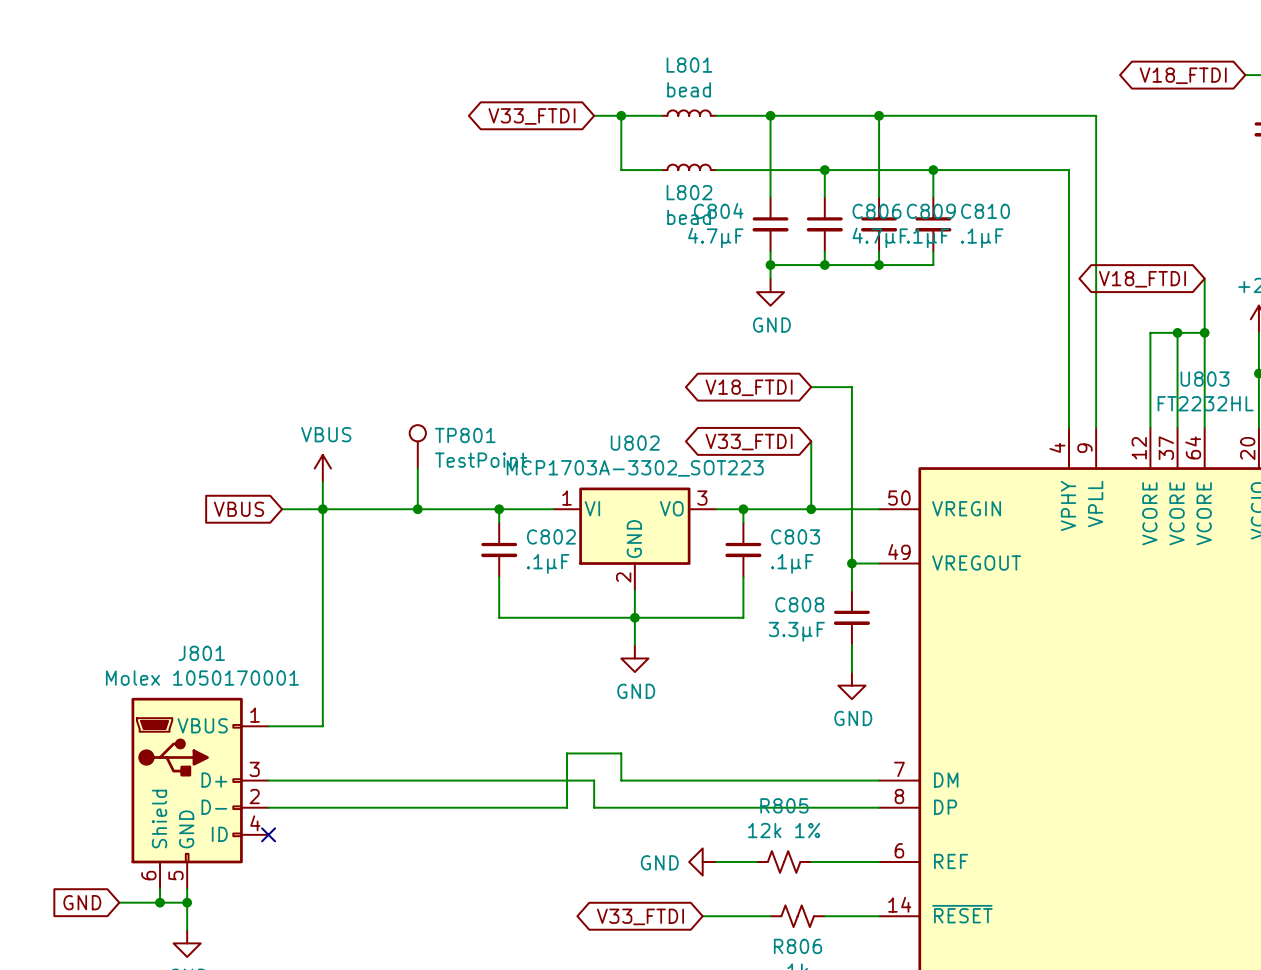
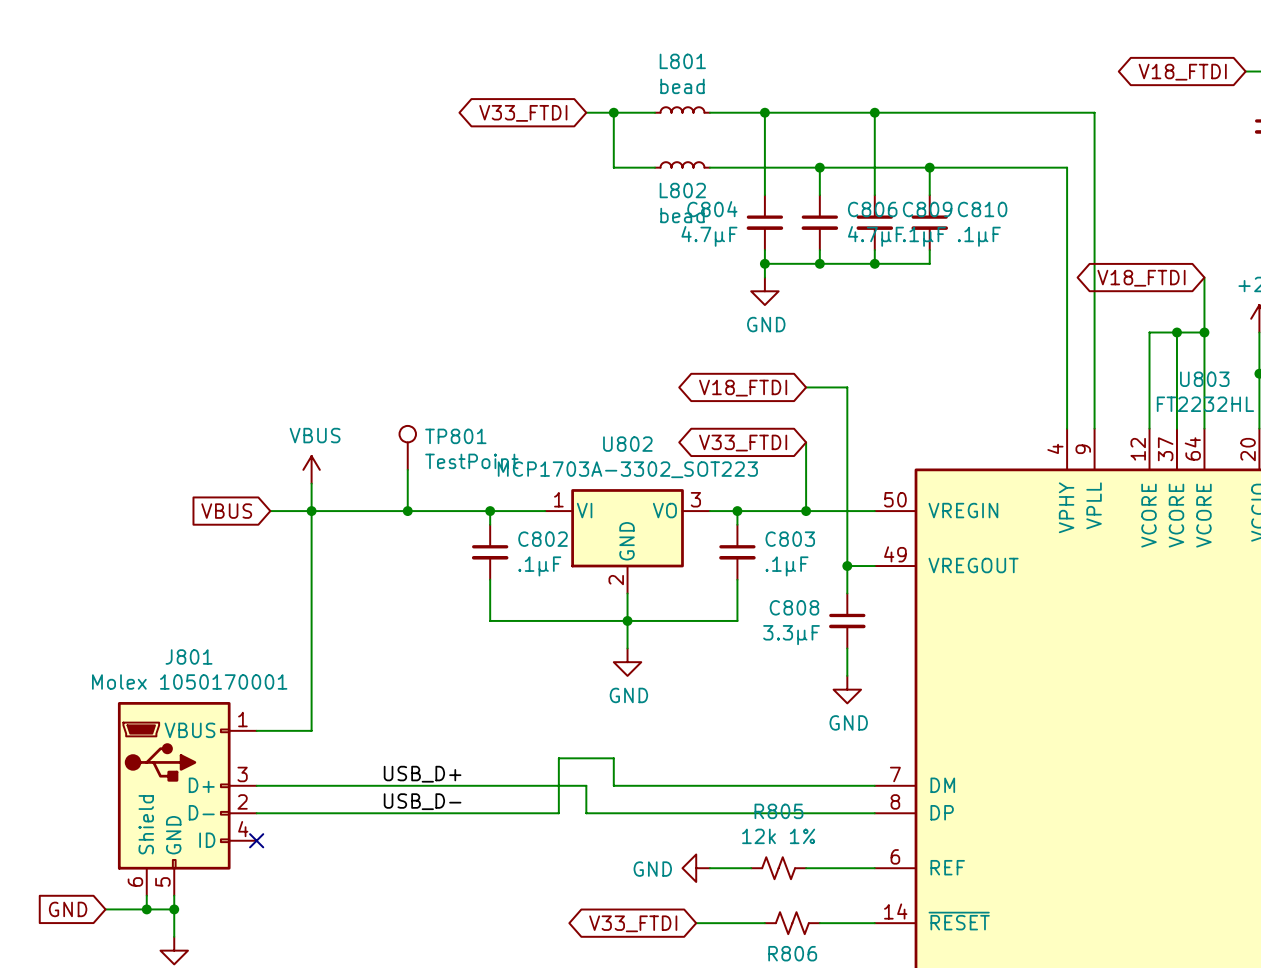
label: none -> USB_D+ (422, 774)
label: none -> USB_D- (422, 801)

